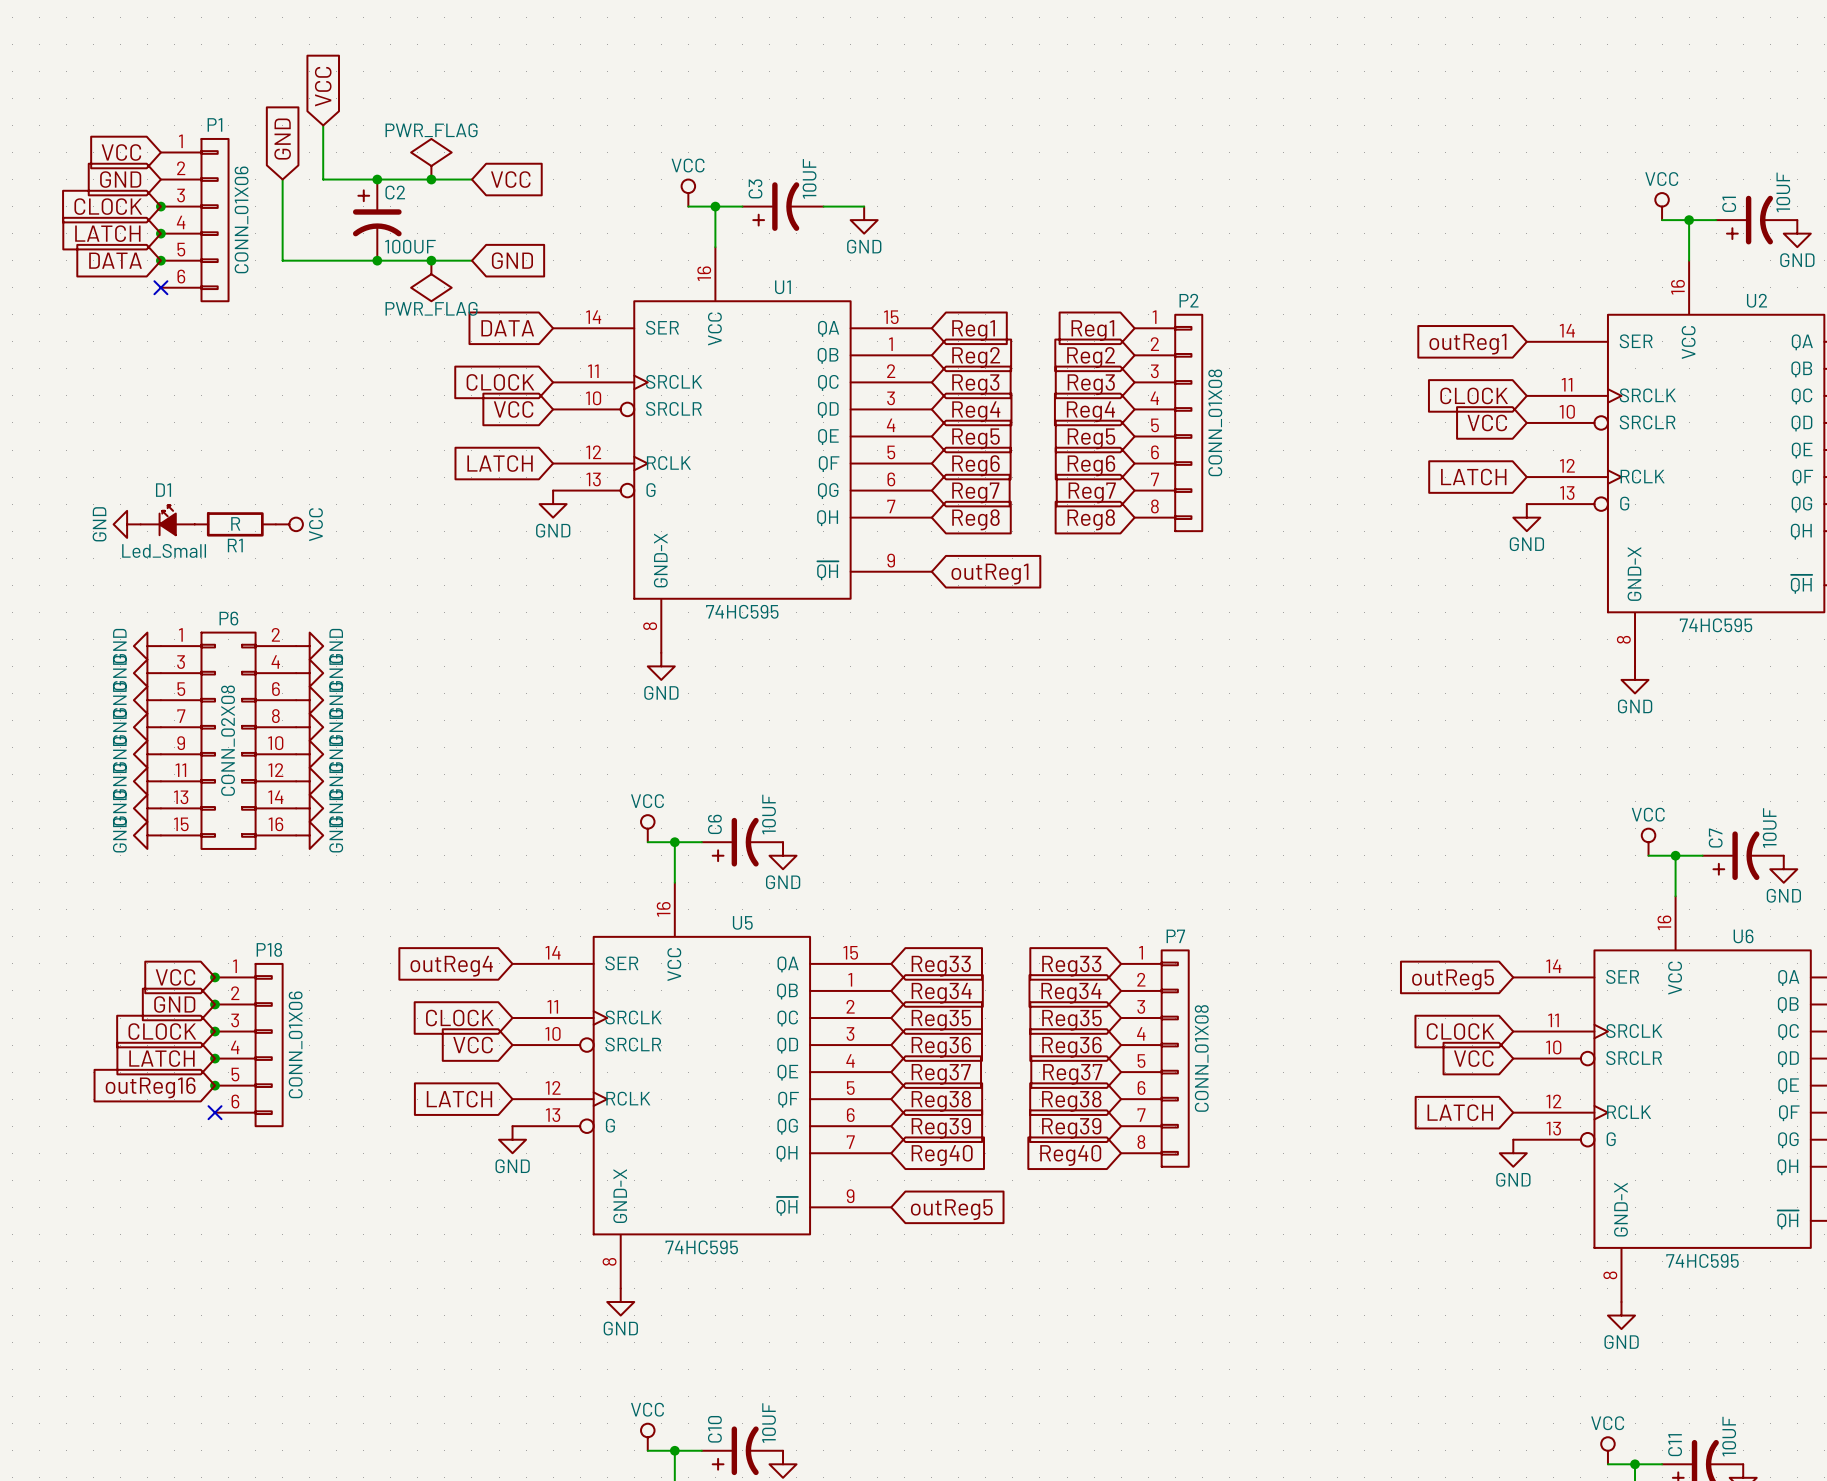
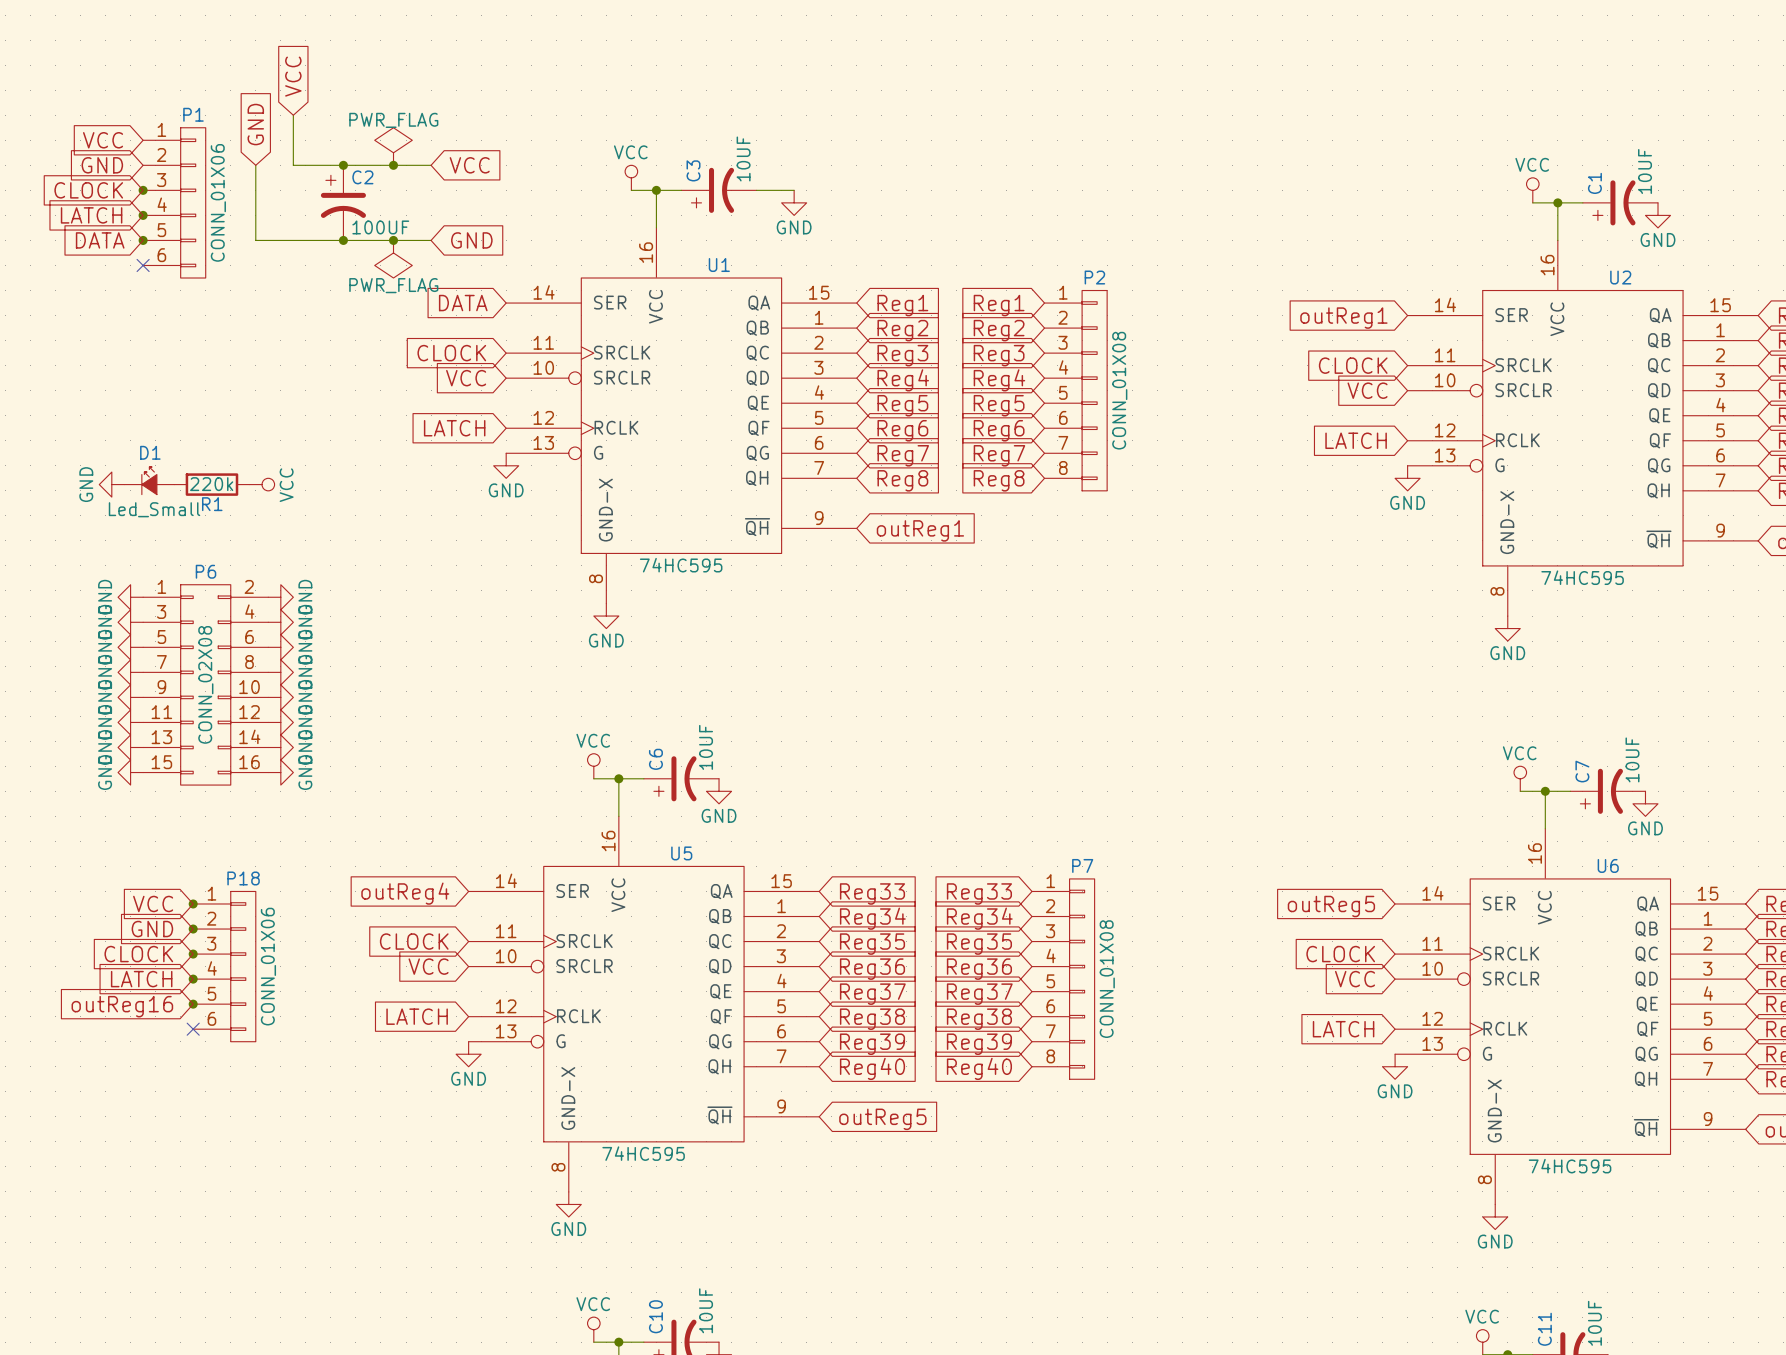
R1 value: R (235, 523) -> 220k (211, 484)

